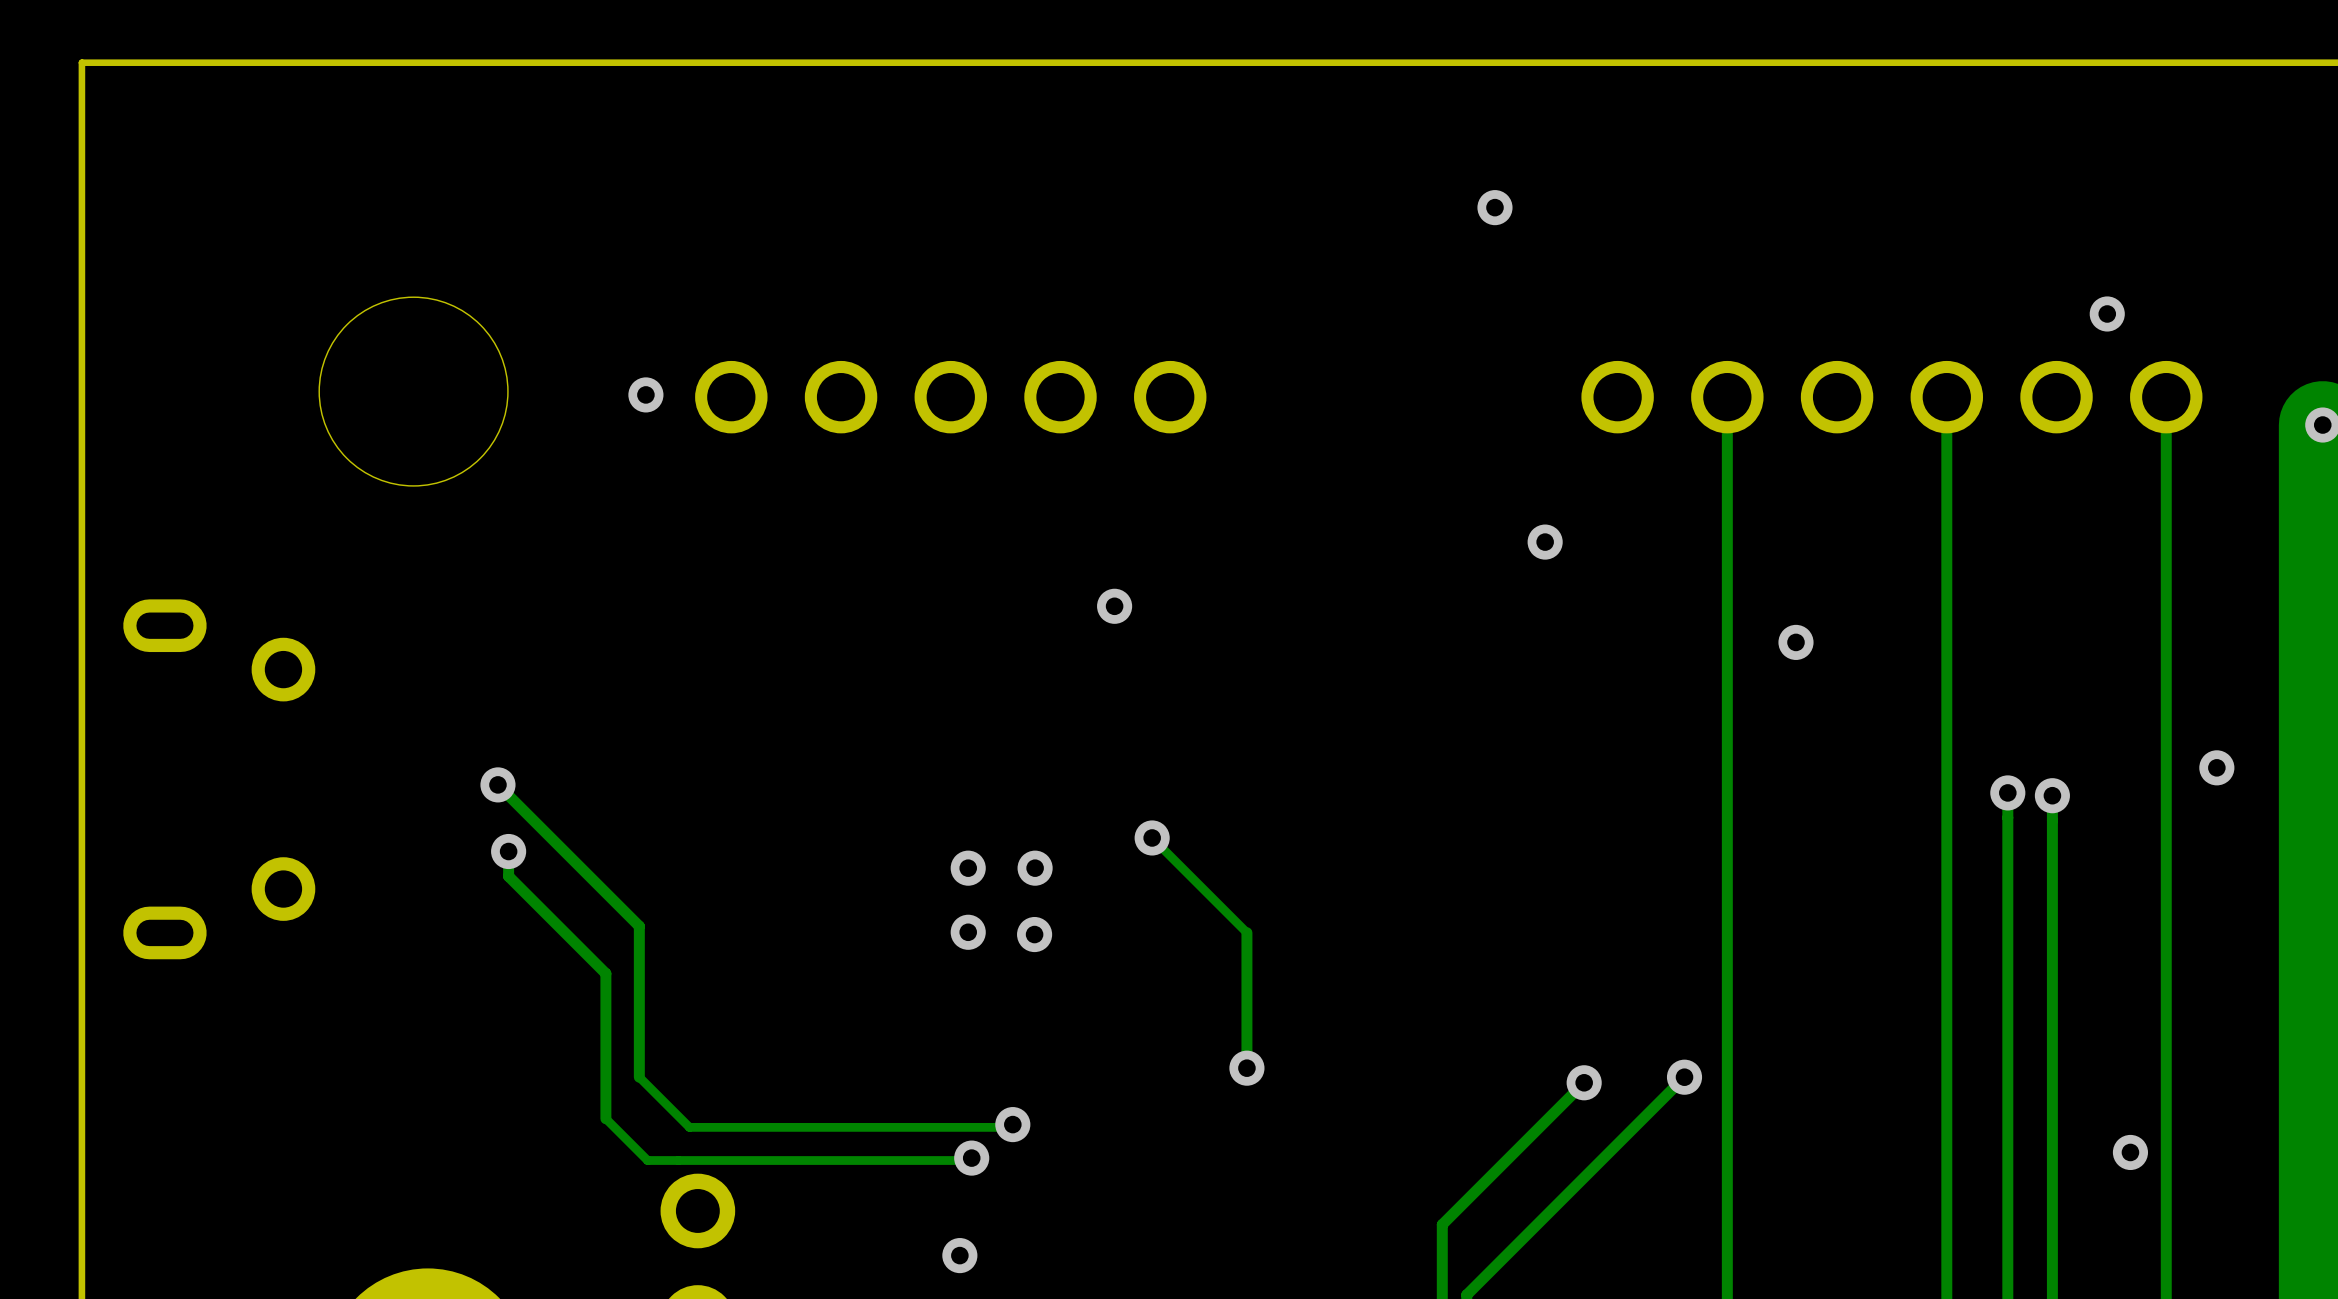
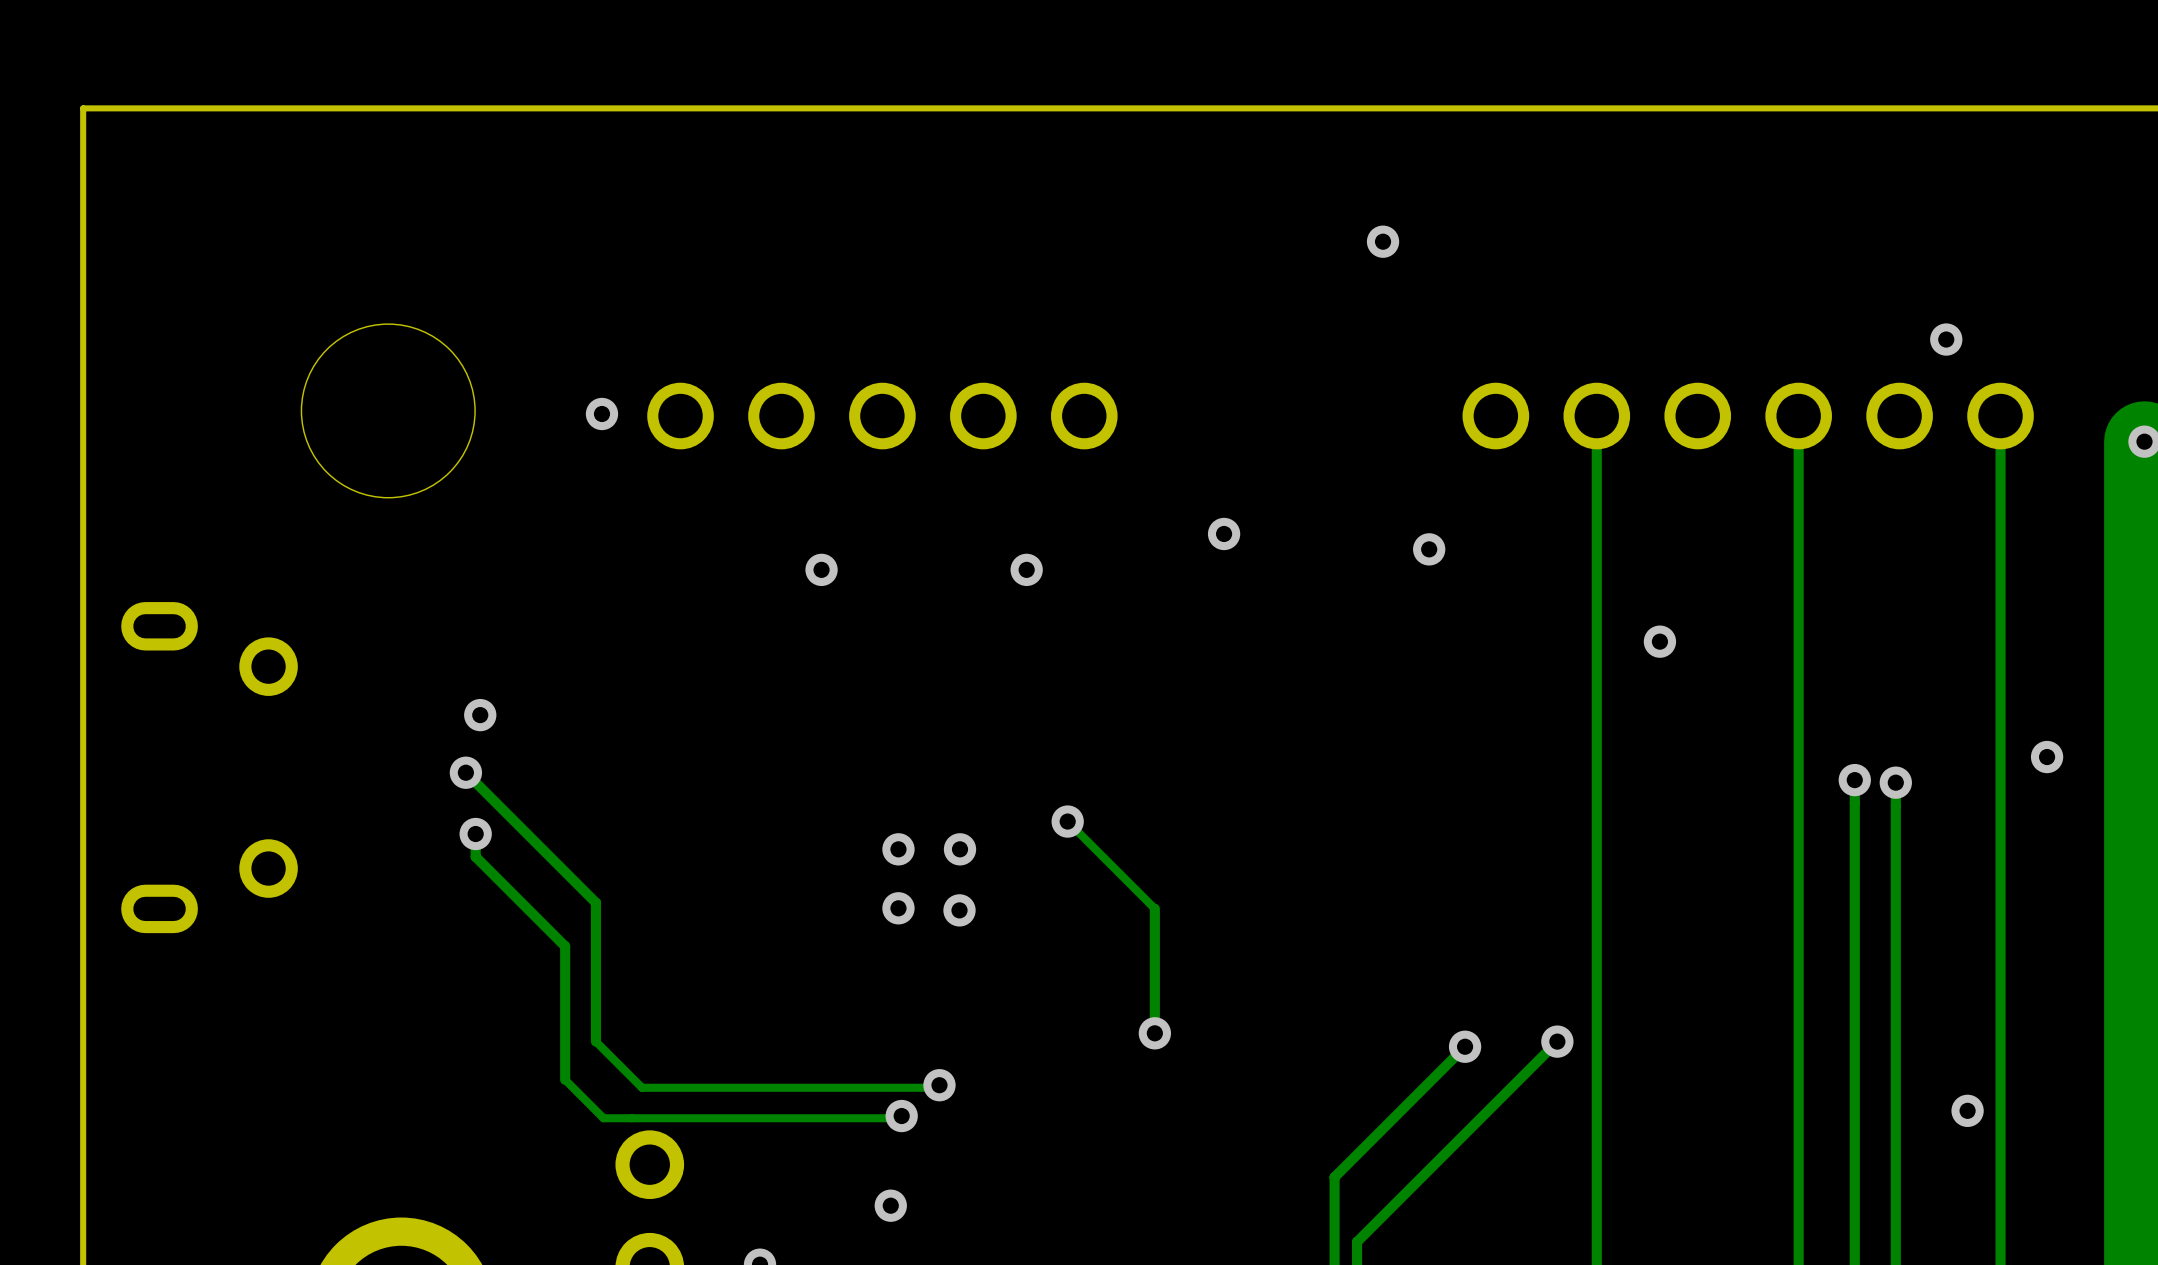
via: none -> (1224, 533)
via: none -> (821, 569)
via position: (1114, 606) -> (1026, 569)
via: none -> (480, 715)

